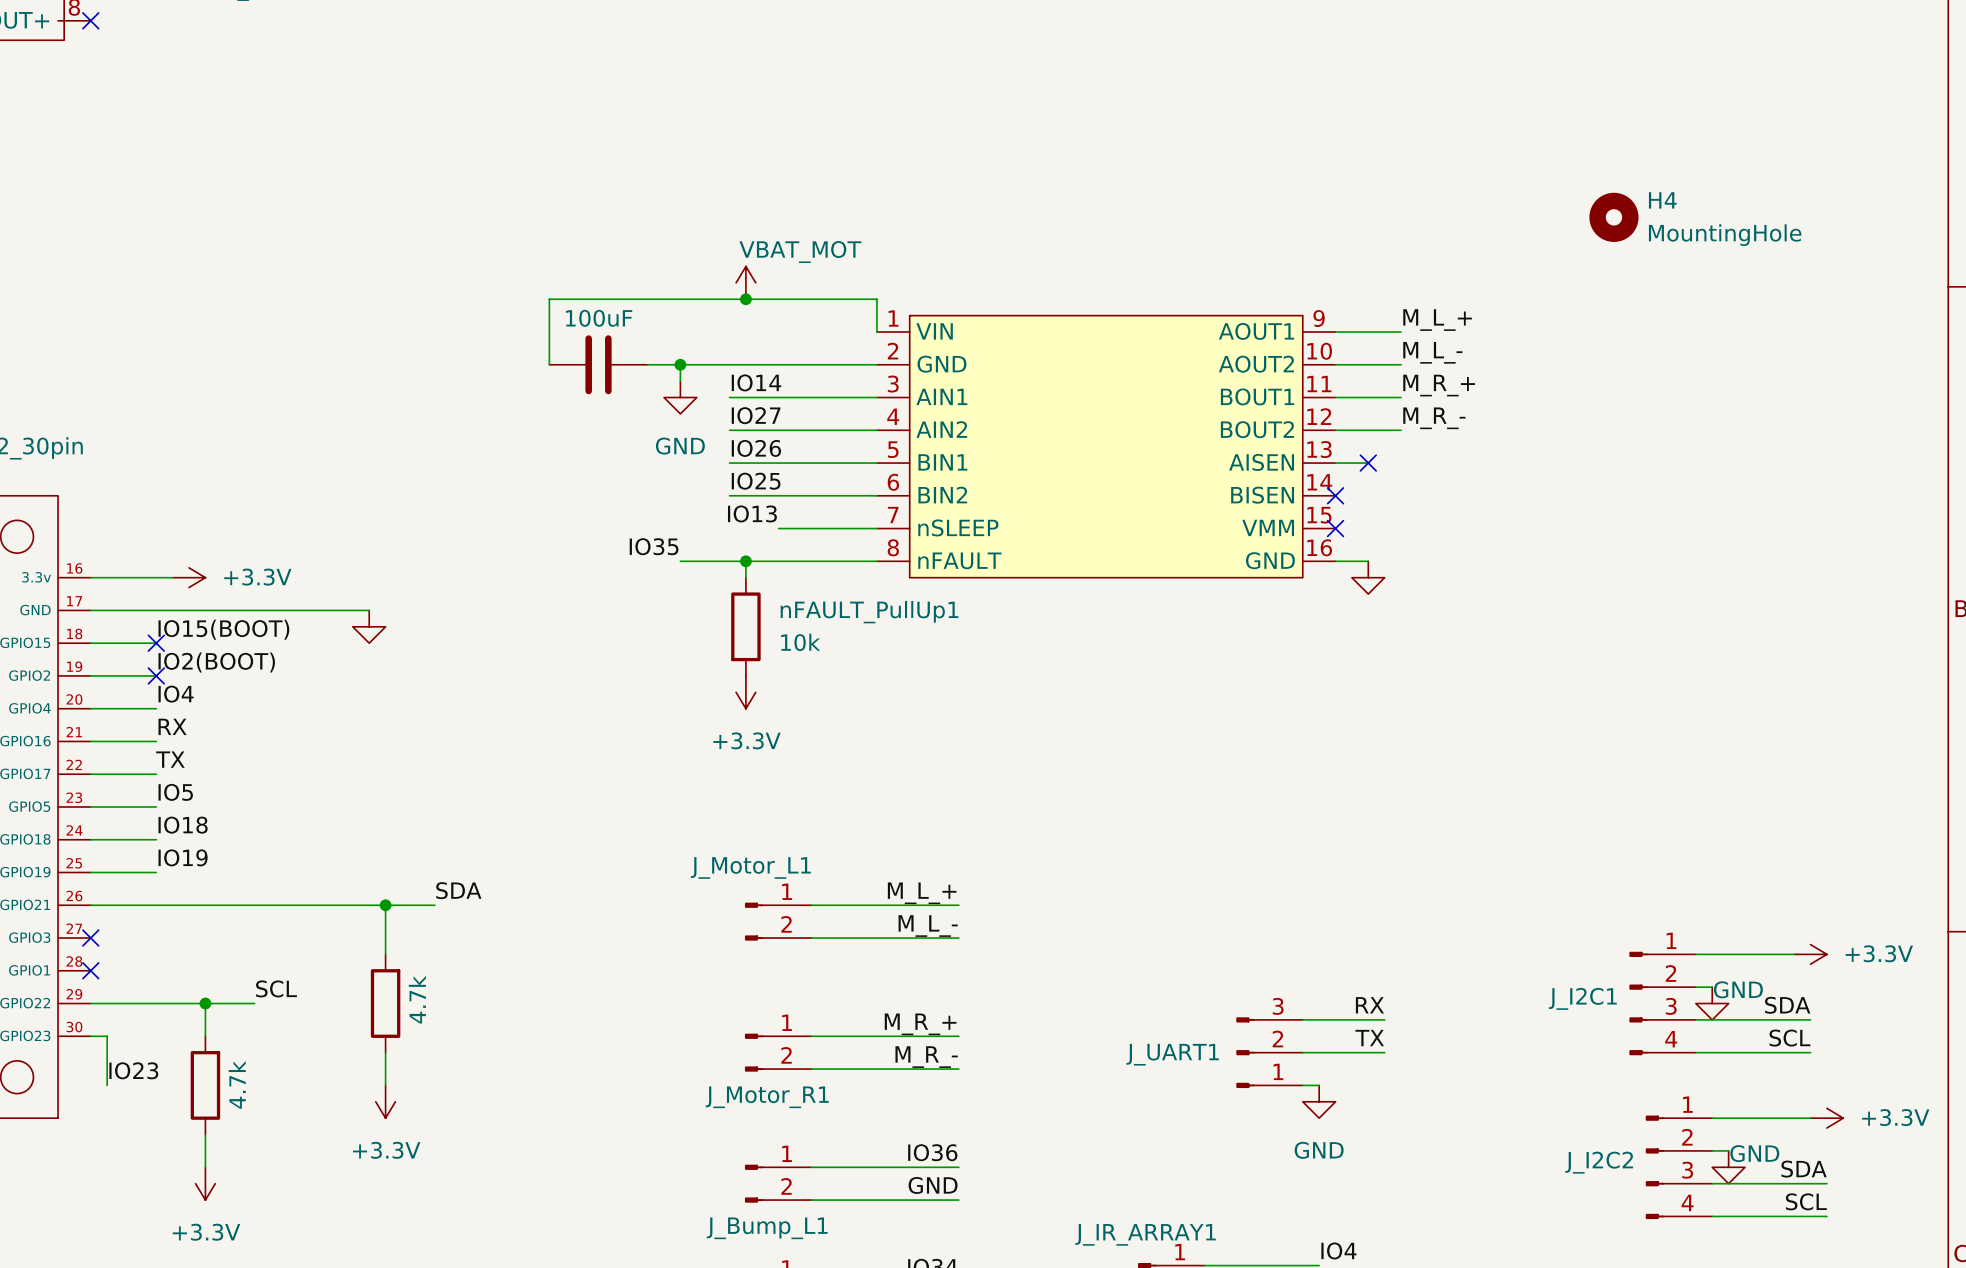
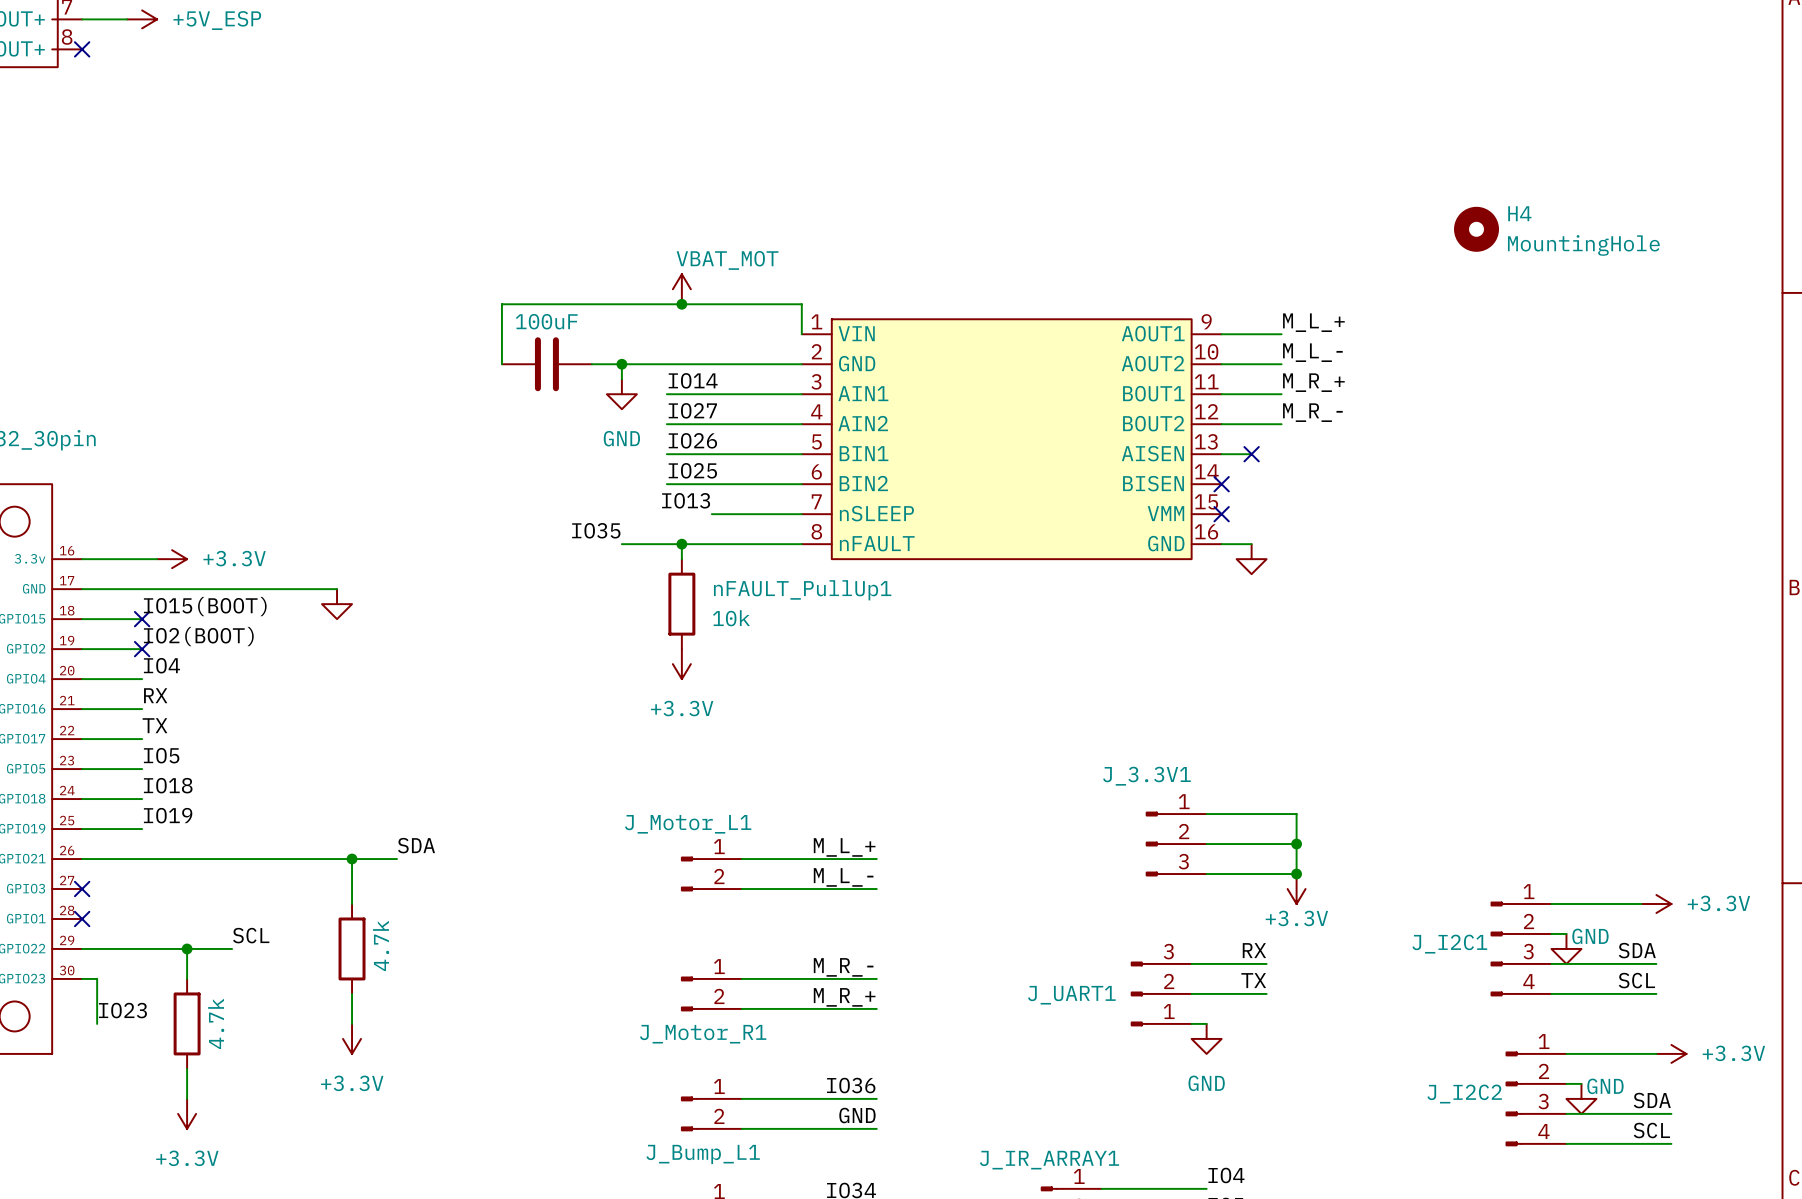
wire: none -> (1206, 814) (1296, 814) (1296, 874) (1206, 874)
J_3.3V1: none -> (1176, 844)
wire: none -> (1206, 844) (1296, 844)
junction: none -> (1296, 844)
junction: none -> (1296, 874)
power symbol: none -> +3.3V (1296, 889)
label: M_R_+ (920, 1024) -> M_R_- (843, 967)
label: M_R_- (926, 1057) -> M_R_+ (844, 997)

